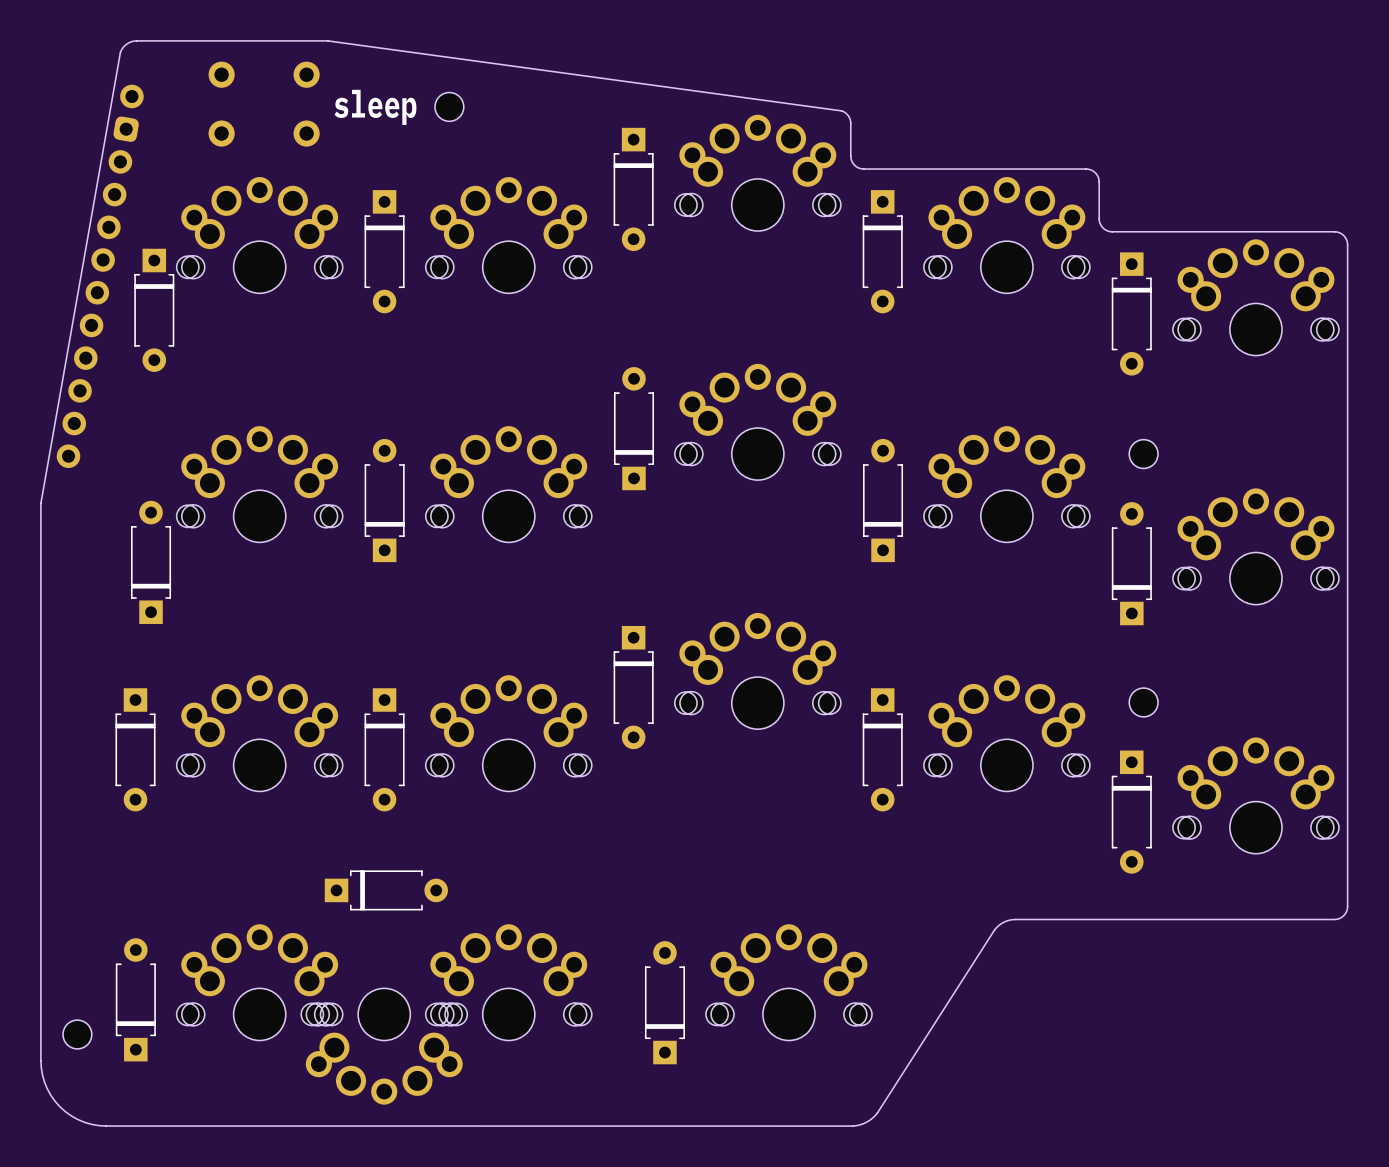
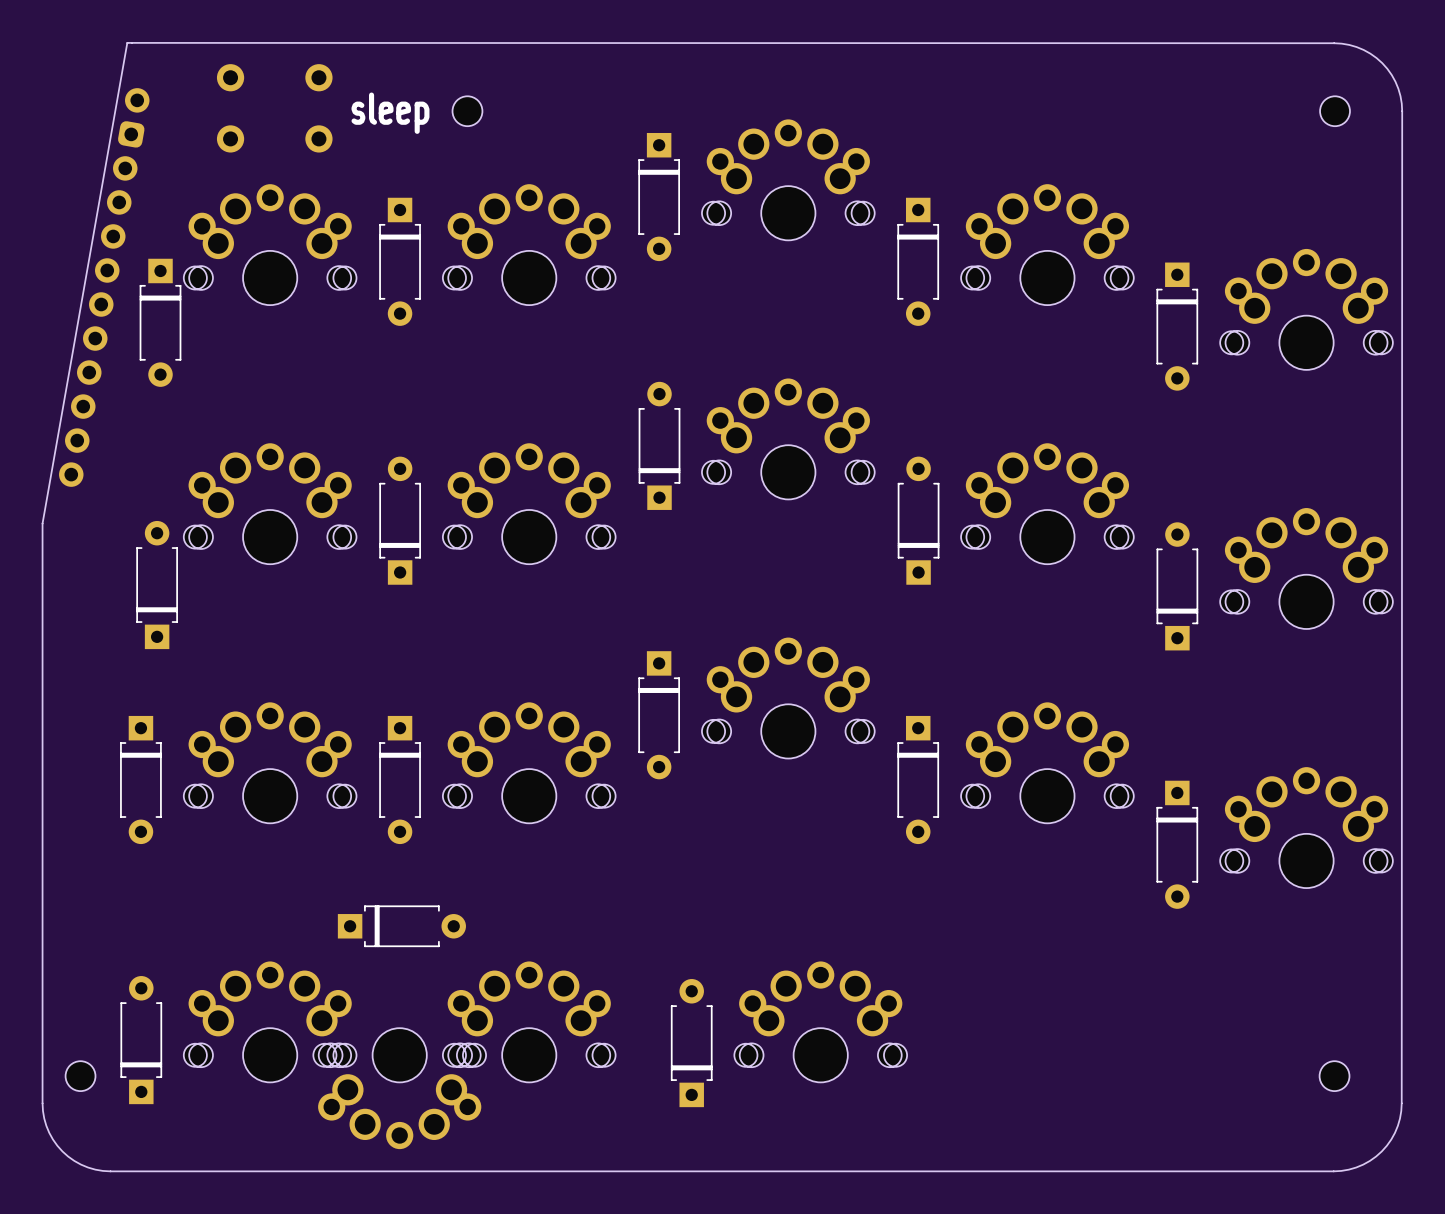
board edge: (120, 52) (126, 44) (136, 40) (327, 40) (841, 110) (847, 114) (850, 120) (851, 160) (855, 166) (860, 168) (1091, 170) (1097, 175) (1099, 180) (1099, 221) (1103, 227) (1109, 231) (1334, 231) (1341, 233) (1345, 237) (1347, 244) (1347, 906) (1343, 915) (1334, 919) (1015, 919) (1003, 922) (994, 929) (877, 1113) (866, 1122) (856, 1125) (106, 1126) -> (125, 54) (127, 42) (1334, 43) (1356, 47) (1376, 58) (1387, 68) (1395, 81) (1400, 96) (1402, 111) (1401, 1103)
part: none -> (1335, 111)
part: (1143, 454) -> none
part: (1143, 702) -> none
part: none -> (1334, 1076)
board edge: none -> (1401, 1103) (1397, 1125) (1391, 1139) (1381, 1151) (1363, 1164) (1348, 1169) (1333, 1171) (110, 1171)

